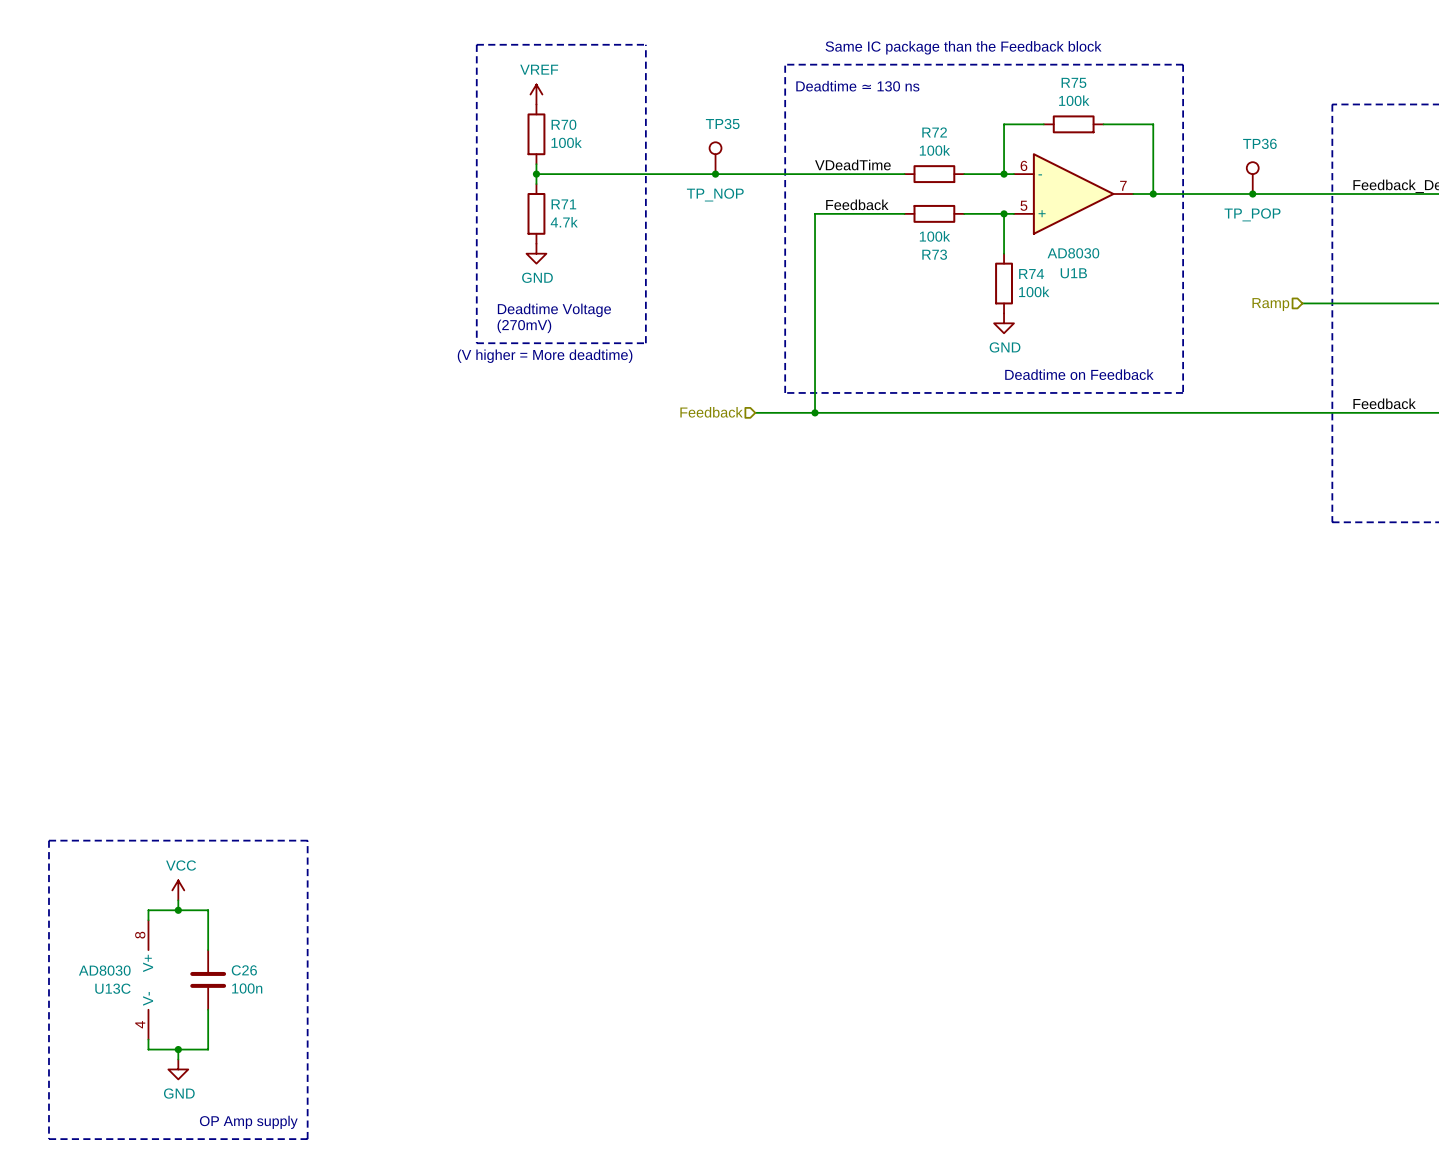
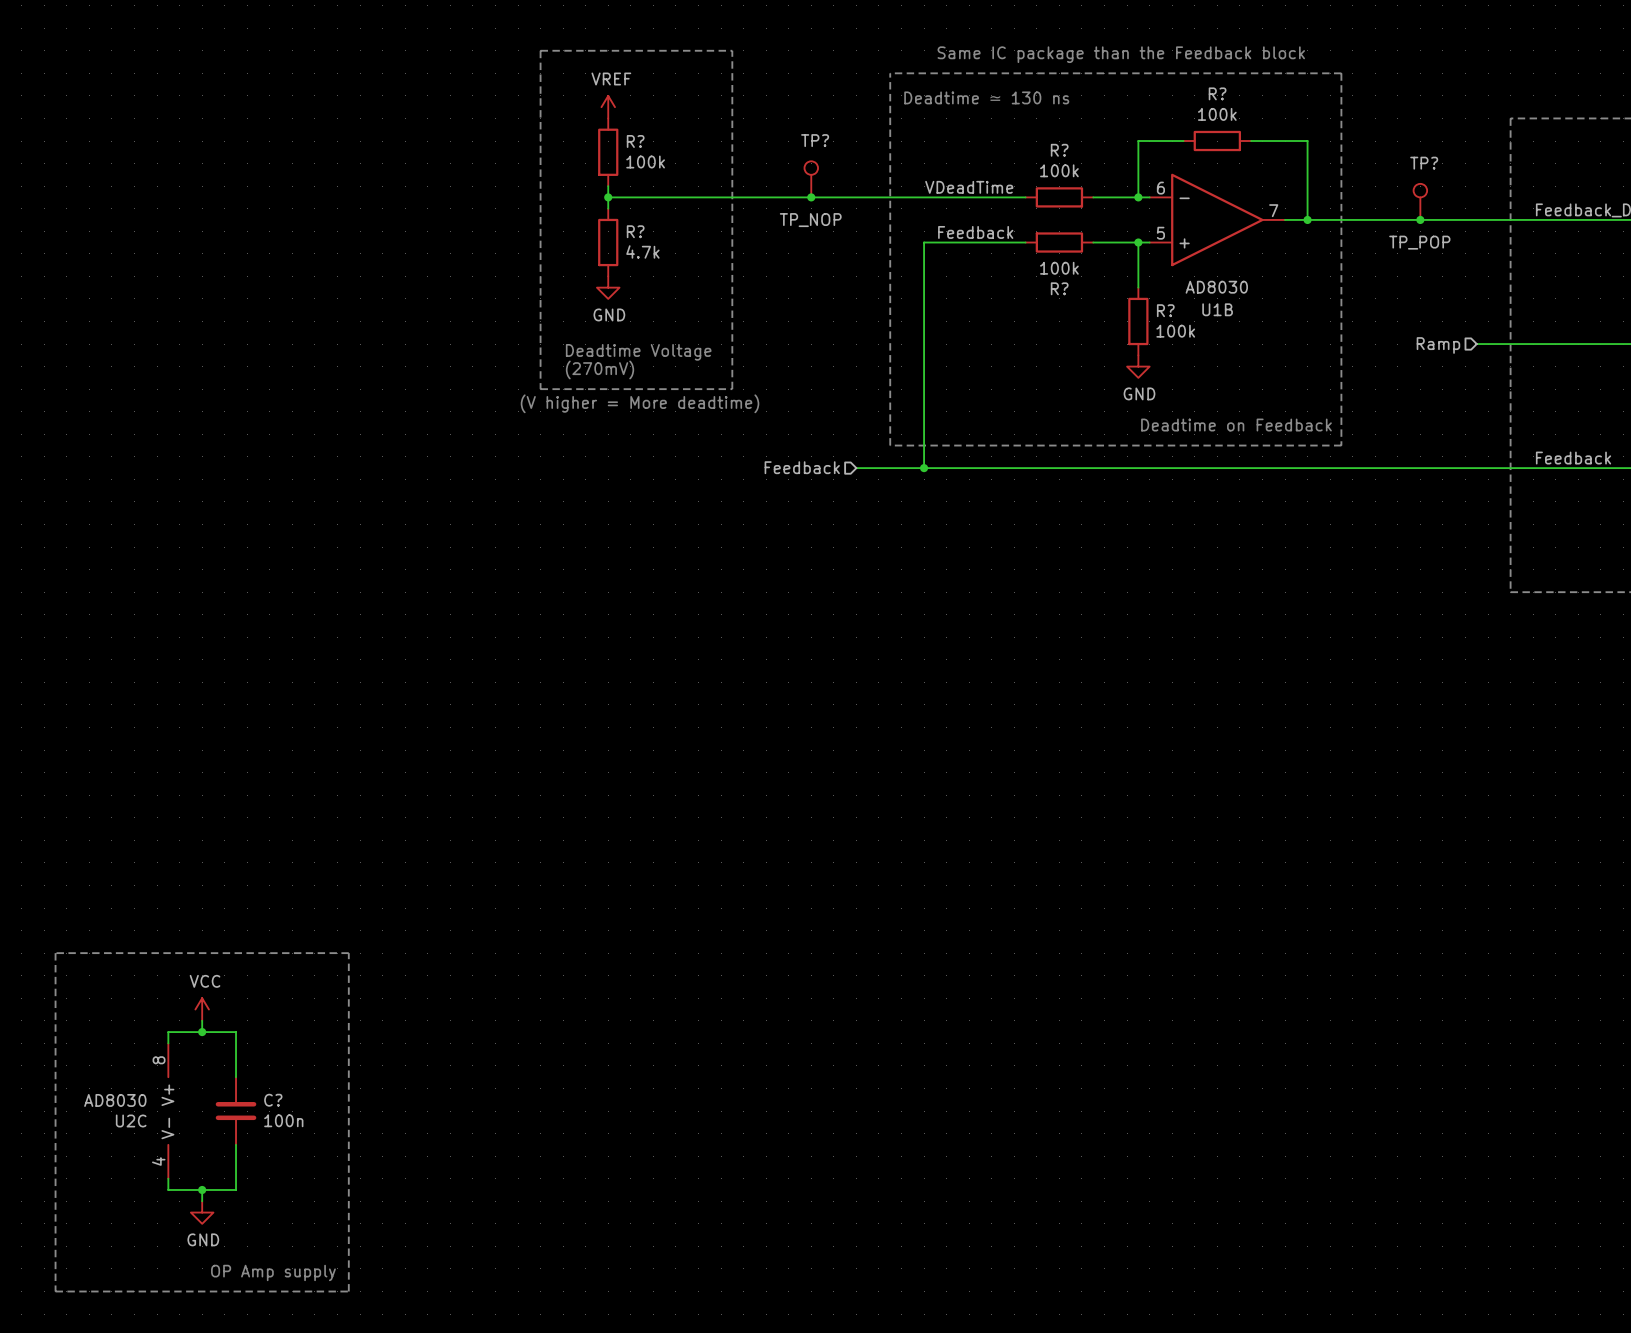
R75 name: R75 (1073, 82) -> R? (1217, 93)
TP35 name: TP35 (722, 123) -> TP? (815, 140)
R70 name: R70 (563, 124) -> R? (635, 141)
R72 name: R72 (934, 132) -> R? (1059, 150)
TP36 name: TP36 (1259, 143) -> TP? (1424, 163)
R71 name: R71 (563, 204) -> R? (635, 231)
R73 name: R73 (934, 254) -> R? (1059, 288)
R74 name: R74 (1031, 274) -> R? (1165, 310)
C26 name: C26 (244, 970) -> C? (273, 1100)
U13C name: U13C (112, 988) -> U2C (131, 1120)

